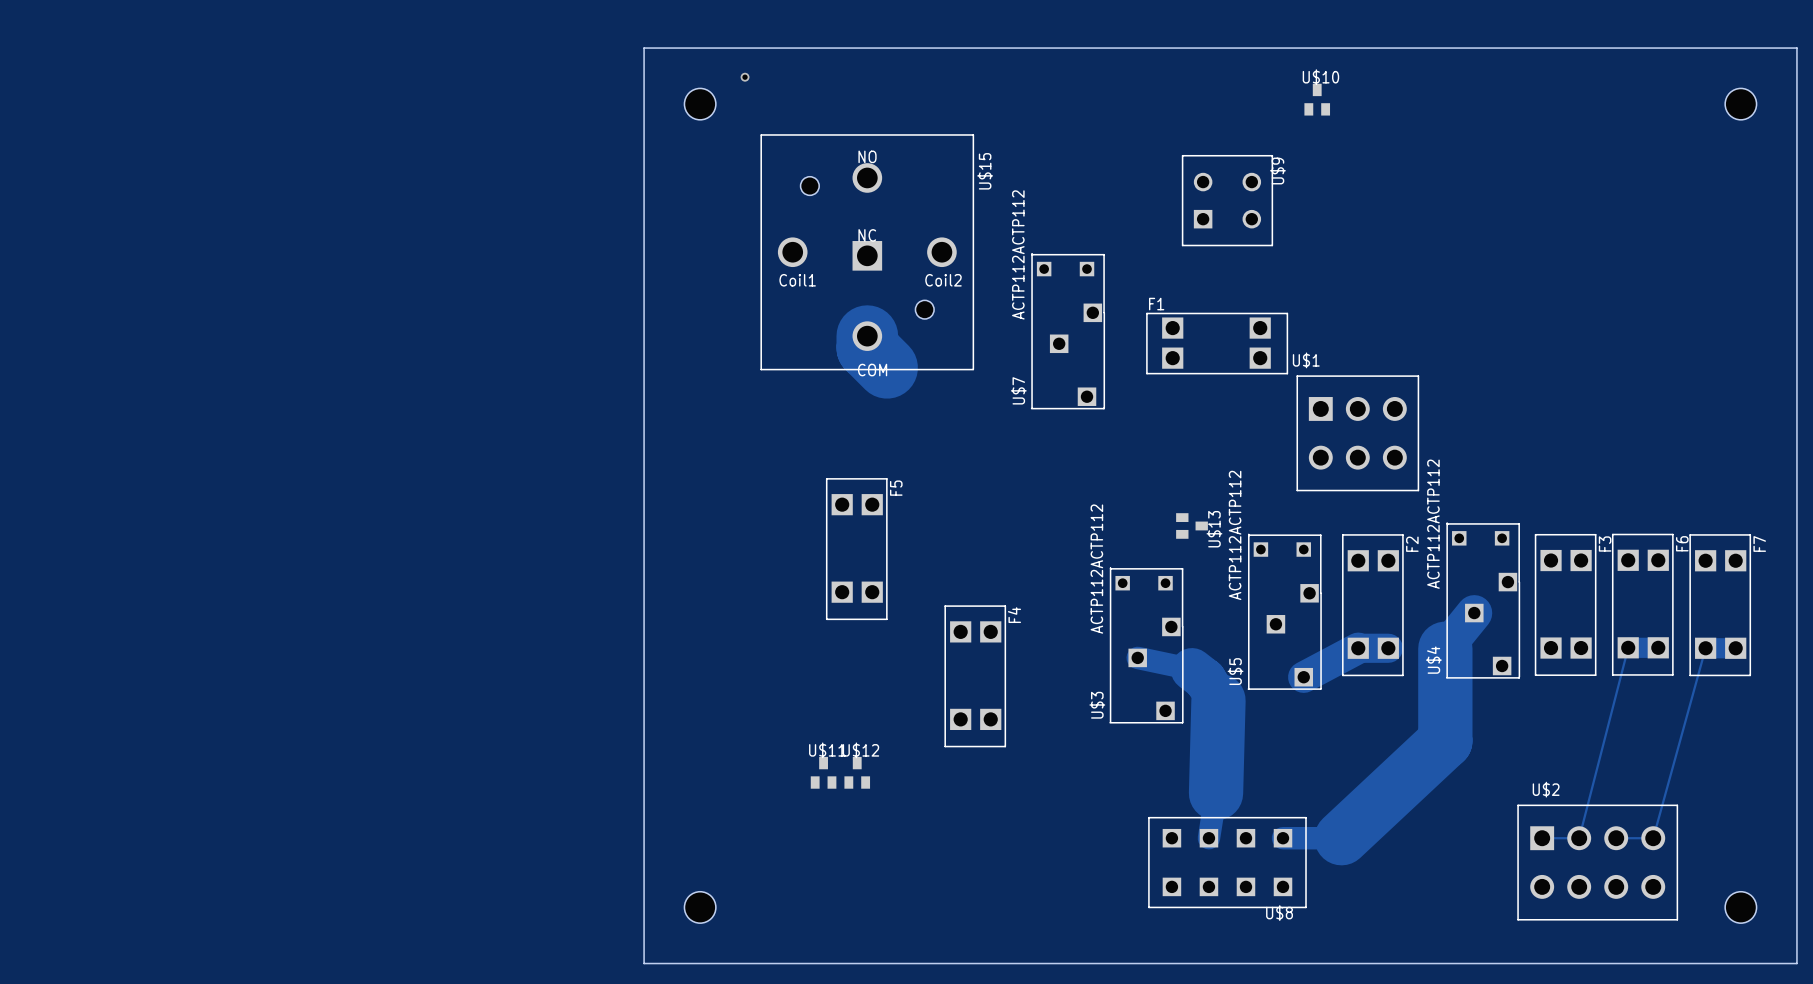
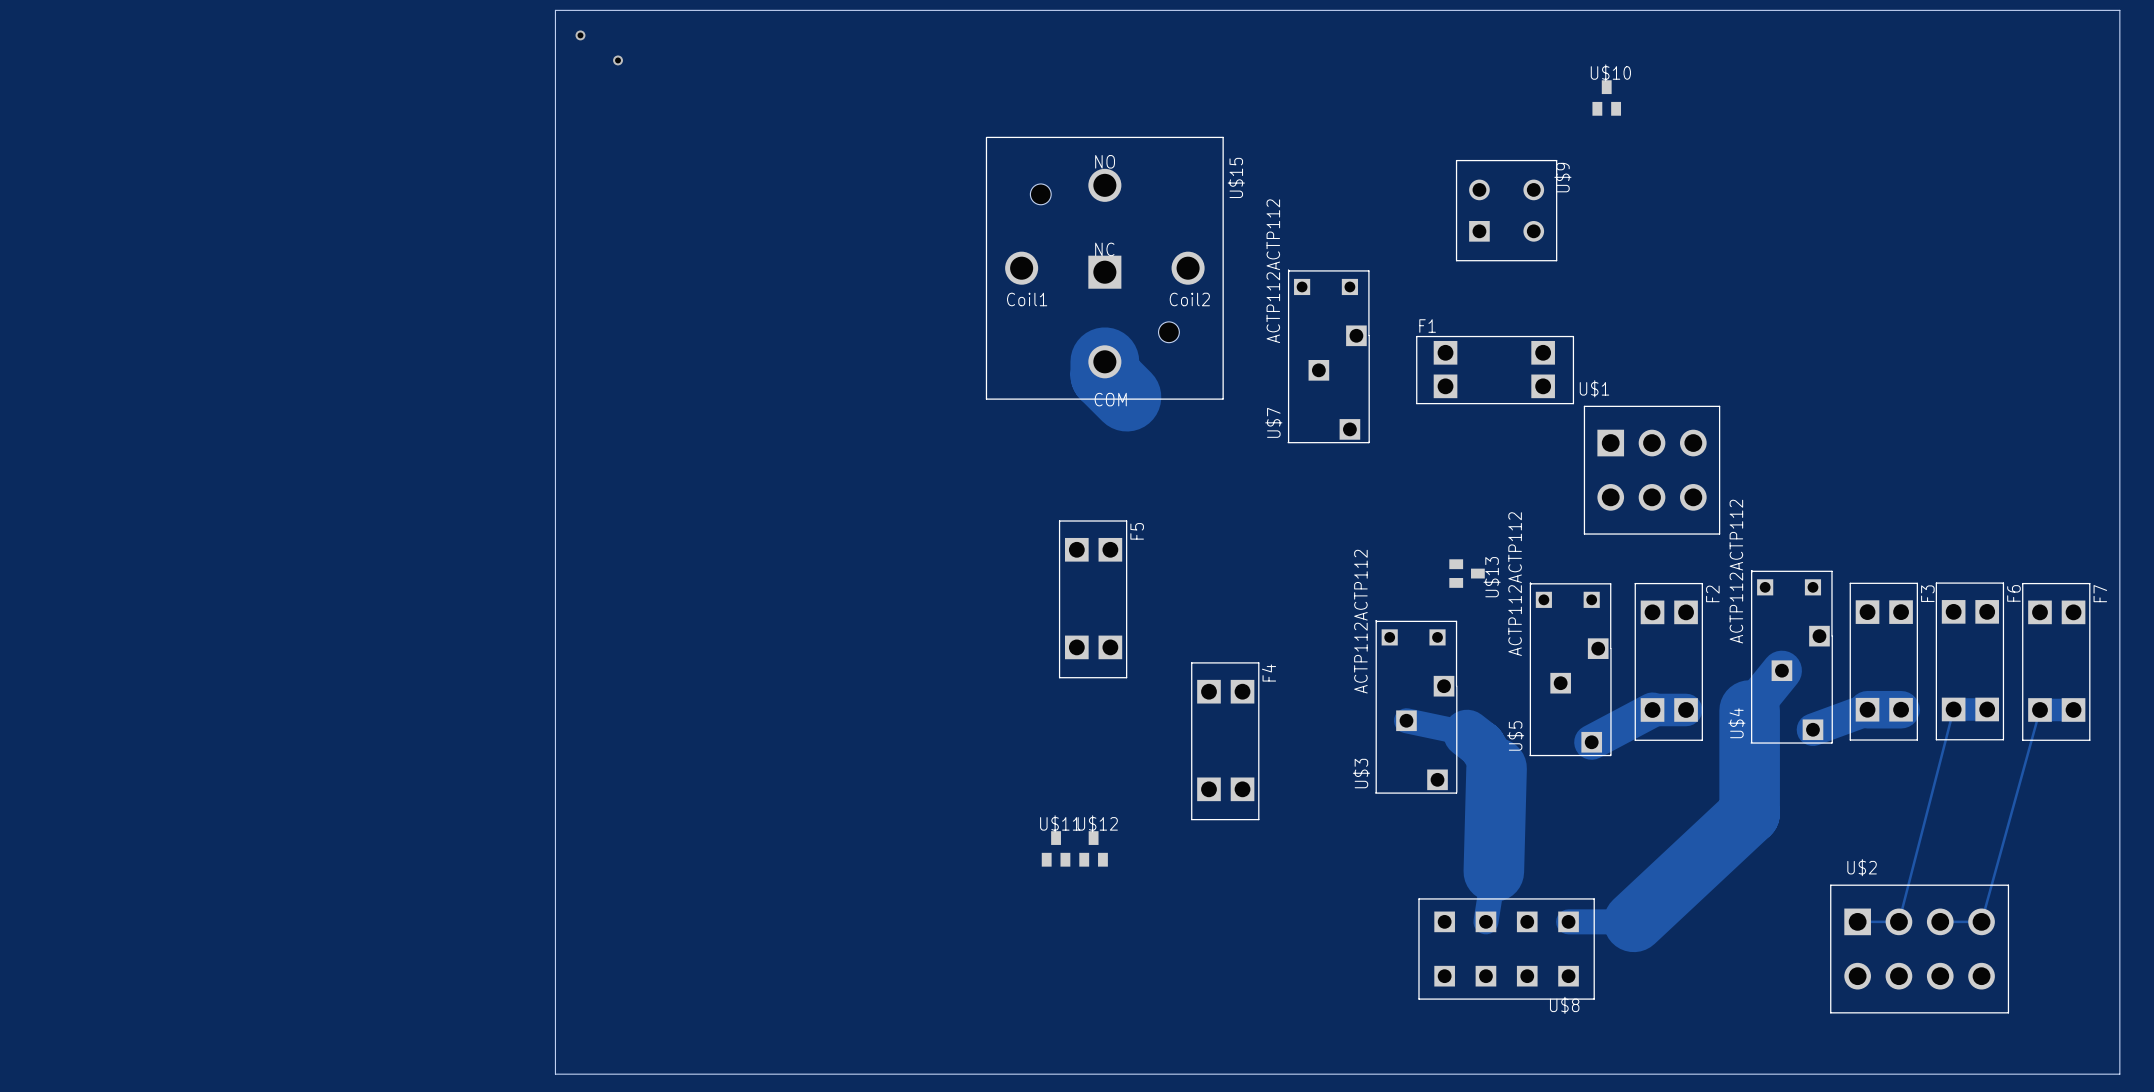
via: none -> (580, 35)
board edge: (644, 48) (644, 963) (1796, 963) (1796, 48) (644, 48) -> (555, 10) (555, 1074) (2119, 1074) (2119, 10) (555, 10)
via: none -> (618, 60)
via: (745, 77) -> none
hole: (700, 104) -> none
hole: (1740, 104) -> none
track: none -> (1901, 709) (1867, 709) (1812, 729)
hole: (700, 907) -> none
hole: (1740, 907) -> none

